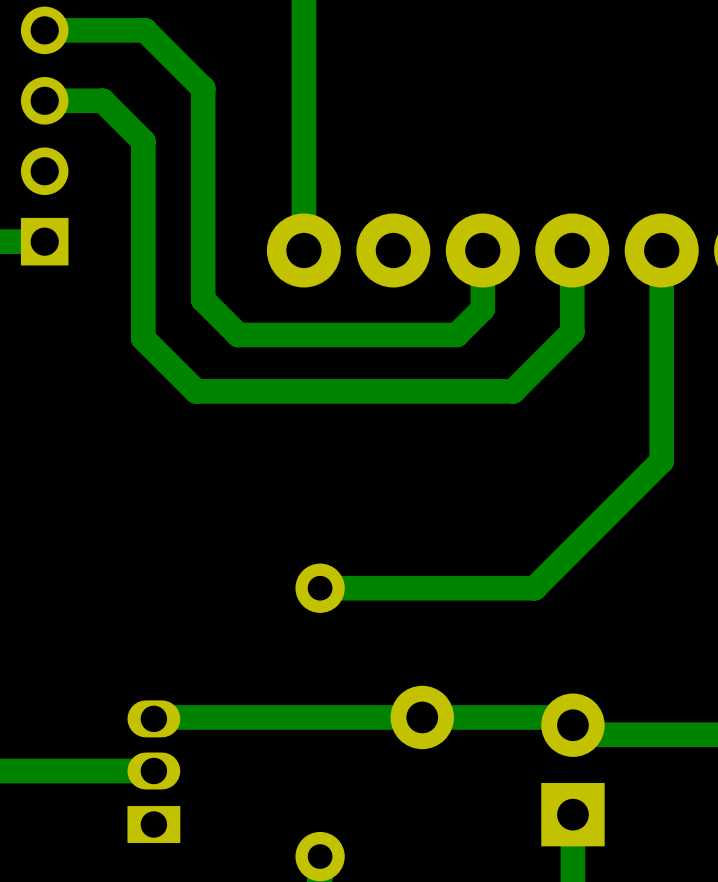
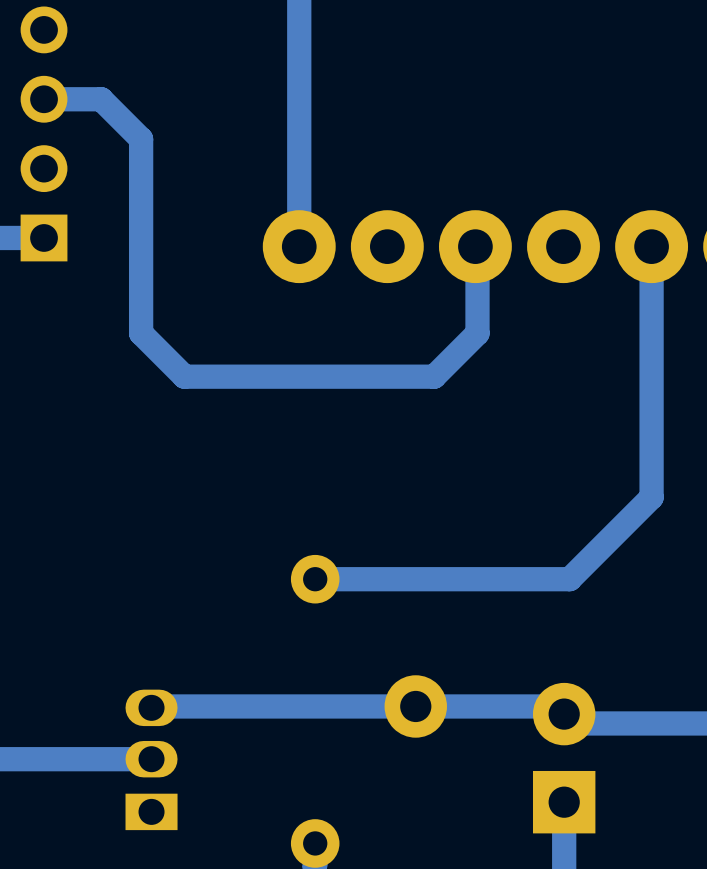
bottom track: (44, 30) (145, 30) (203, 88) (203, 299) (238, 335) (456, 335) (482, 308) (482, 250) -> none
bottom track: (572, 250) (572, 332) (513, 391) (196, 391) (187, 382) -> (475, 246) (477, 248) (477, 333) (434, 376) (184, 376)
bottom track: (661, 461) (534, 588) -> (651, 454) (651, 497) (569, 579) (526, 579)

